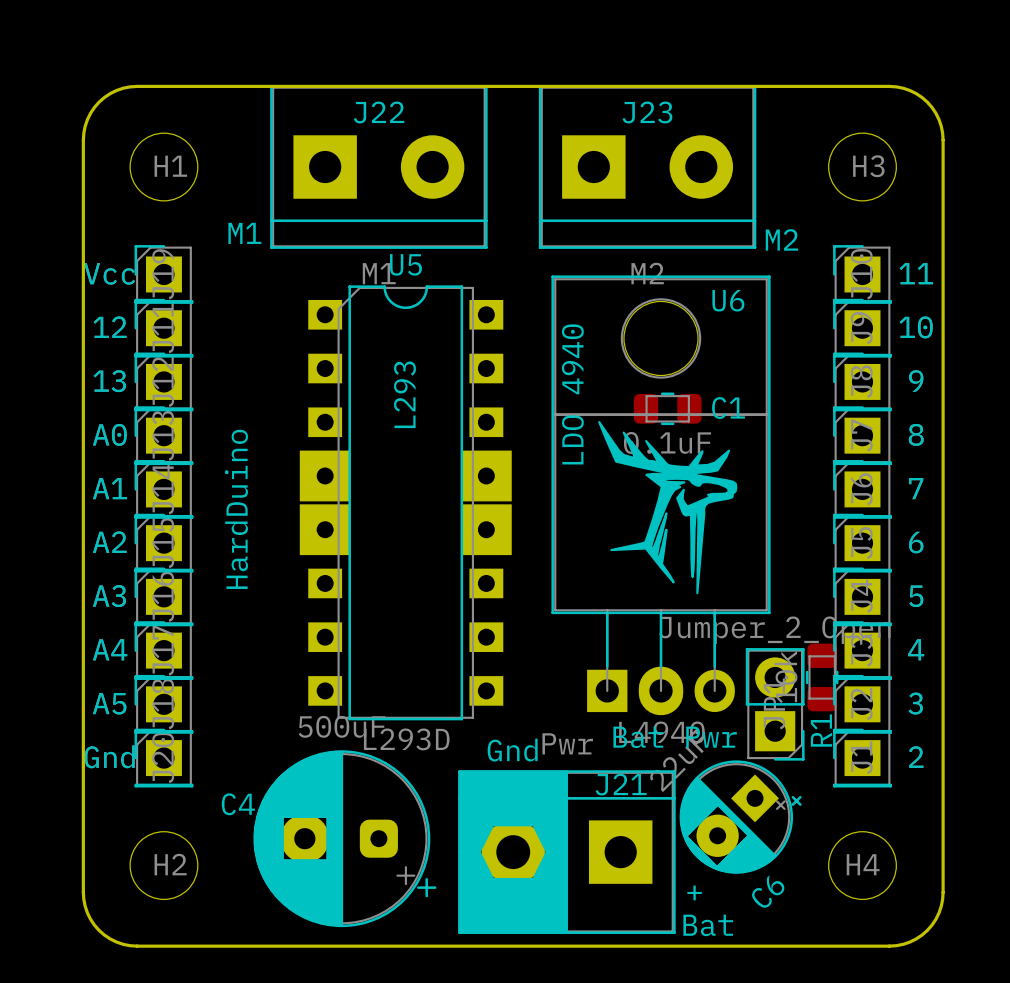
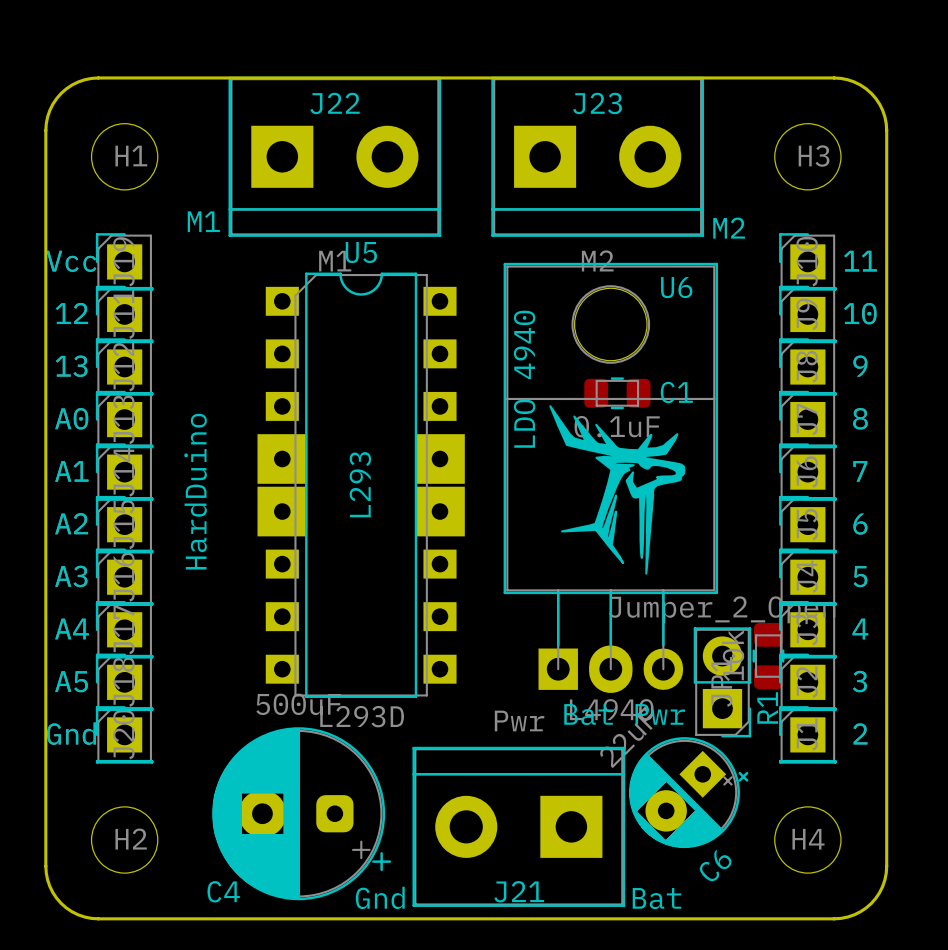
text position: L293 (404, 394) -> L293 (360, 484)
text position: Gnd (512, 750) -> Gnd (380, 897)
drawing: [458, 770, 569, 934] -> none
J21 name position: J21 (621, 784) -> J21 (519, 891)
C4 name position: C4 (238, 804) -> C4 (223, 891)
text: + (694, 892) -> none

